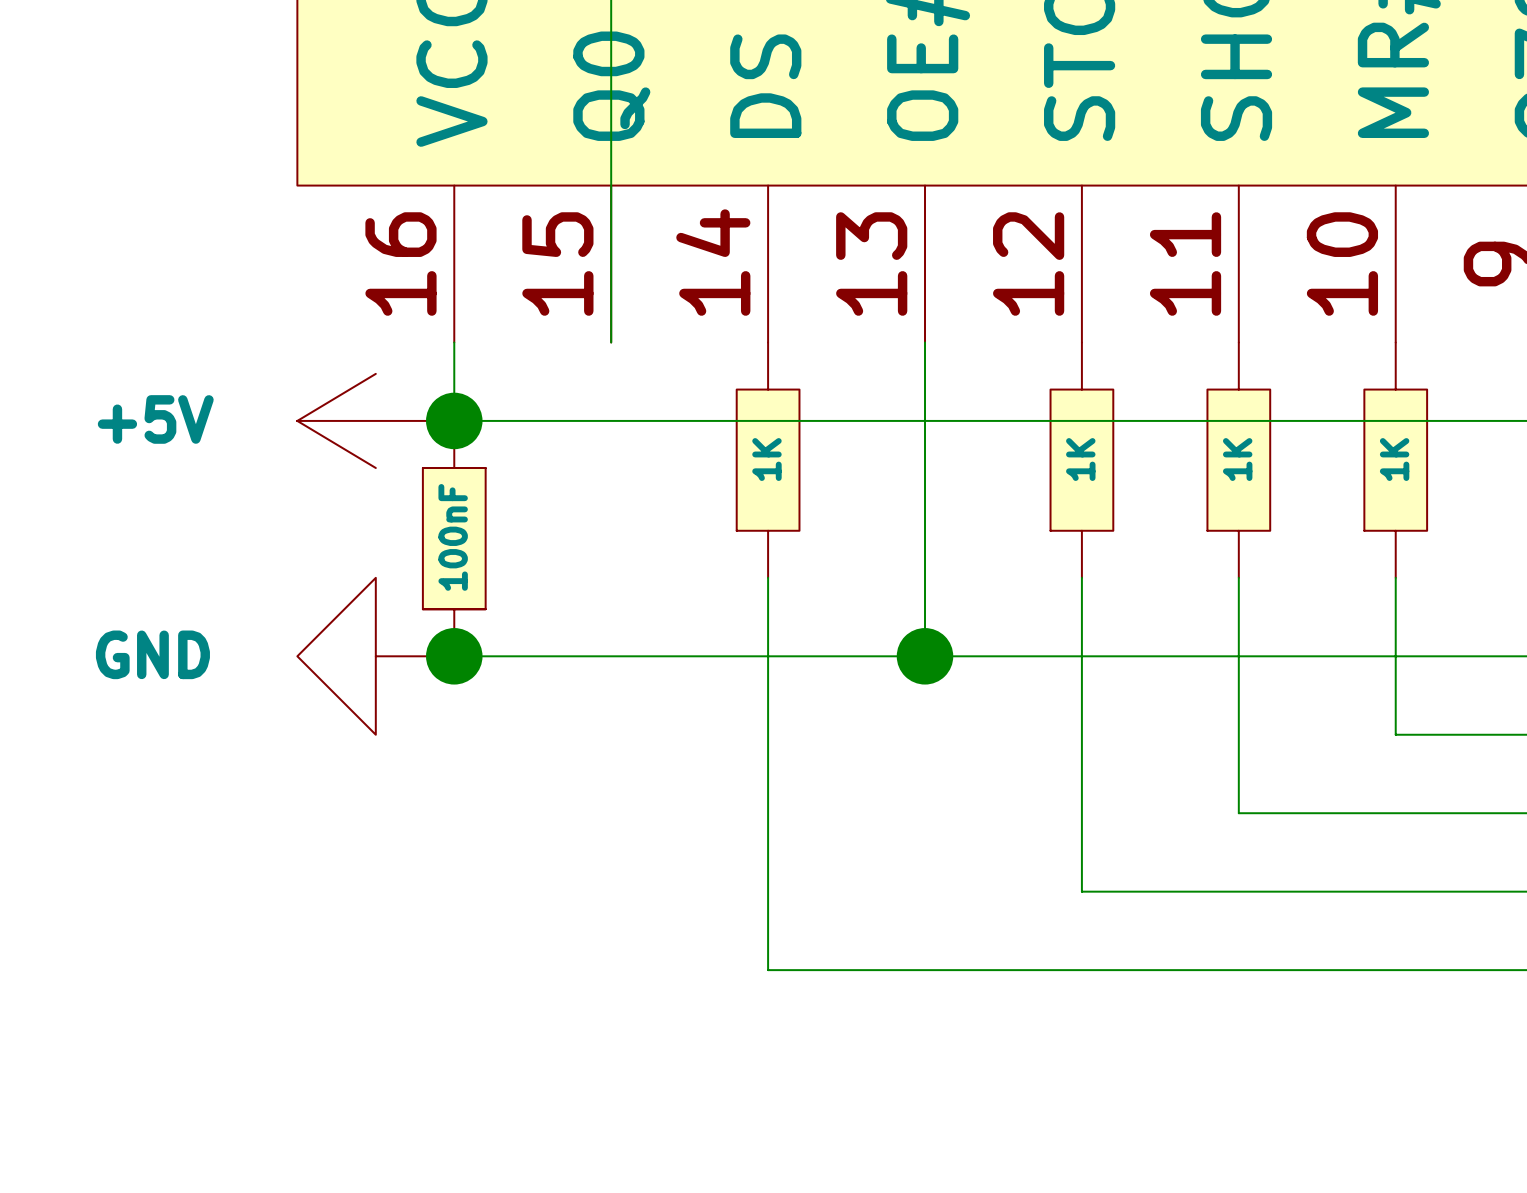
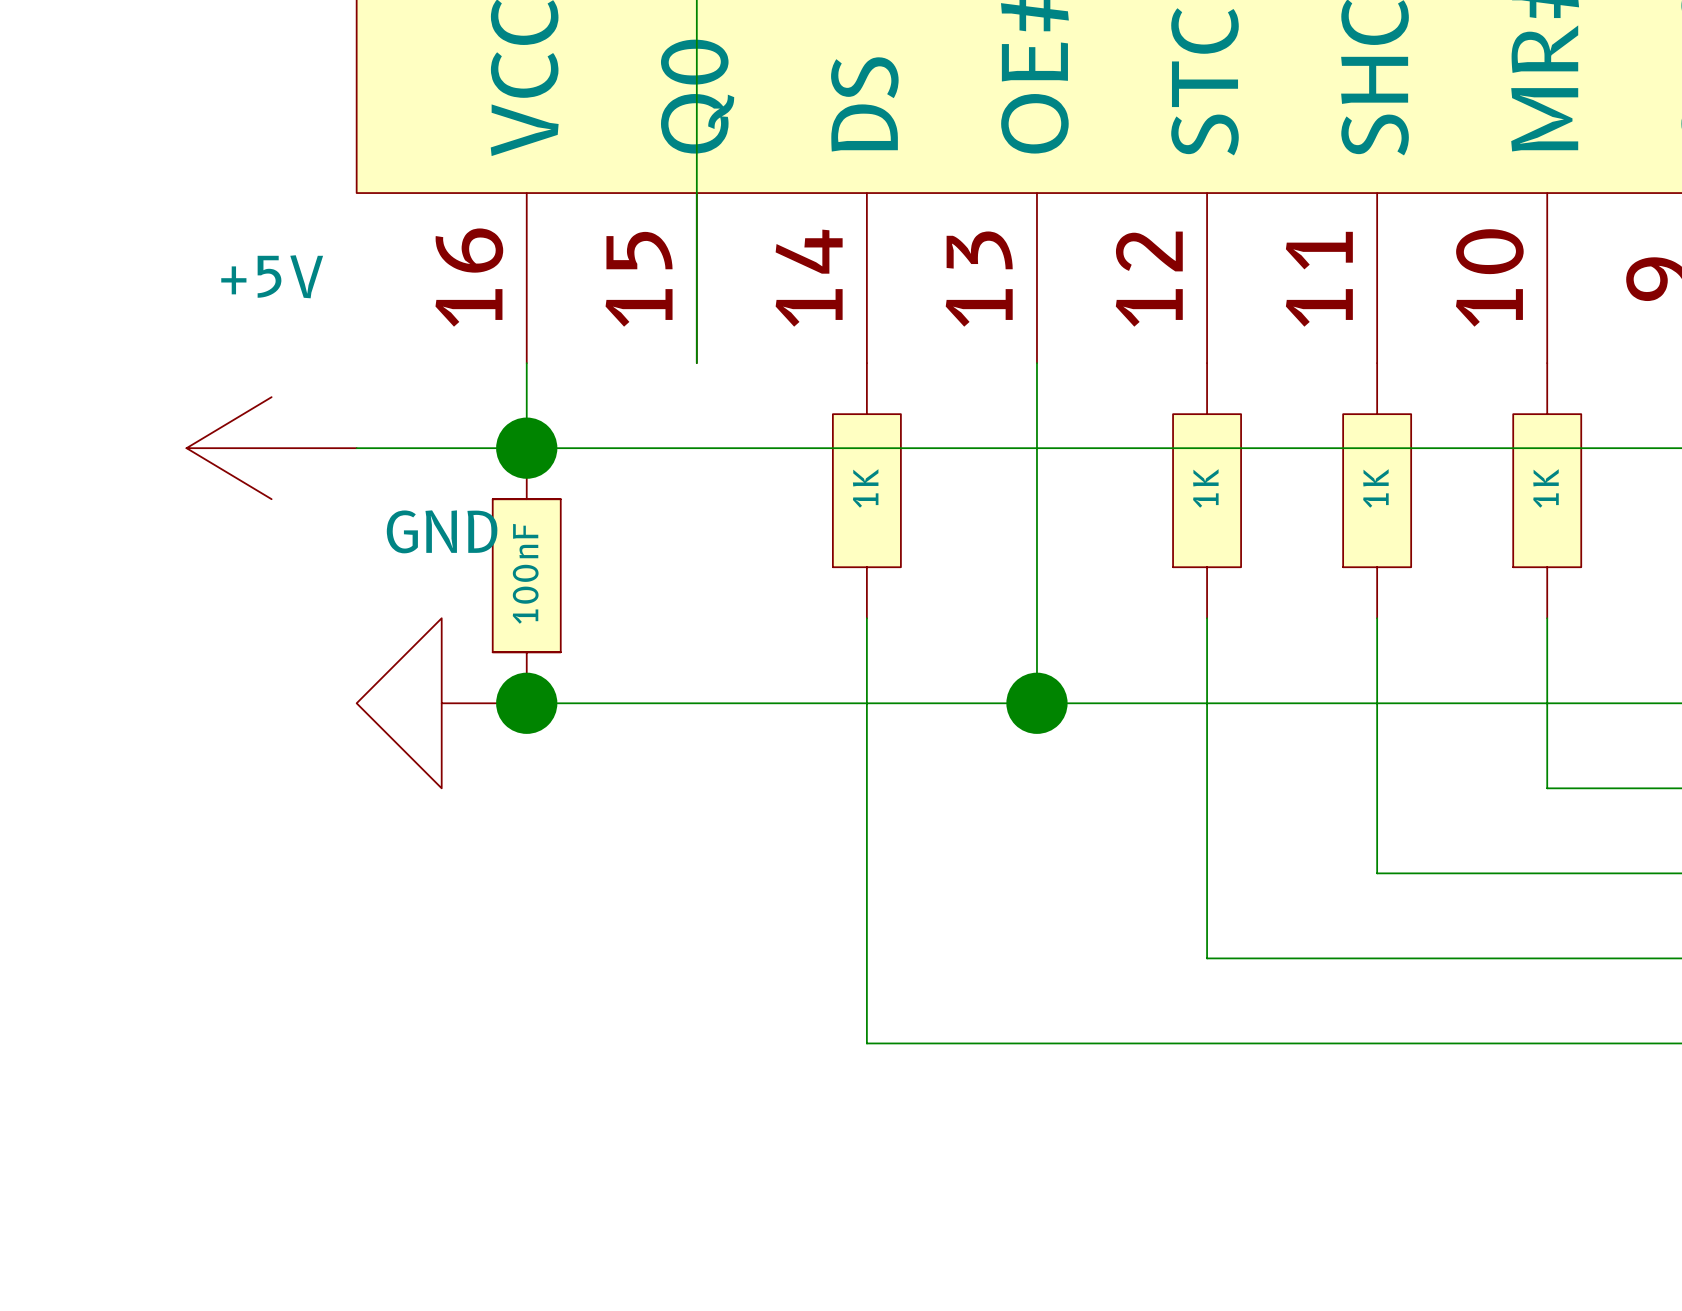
power symbol text position: +5V (155, 419) -> +5V (272, 276)
power symbol position: +5V (375, 420) -> +5V (271, 448)
power symbol text position: GND (152, 654) -> GND (442, 531)

